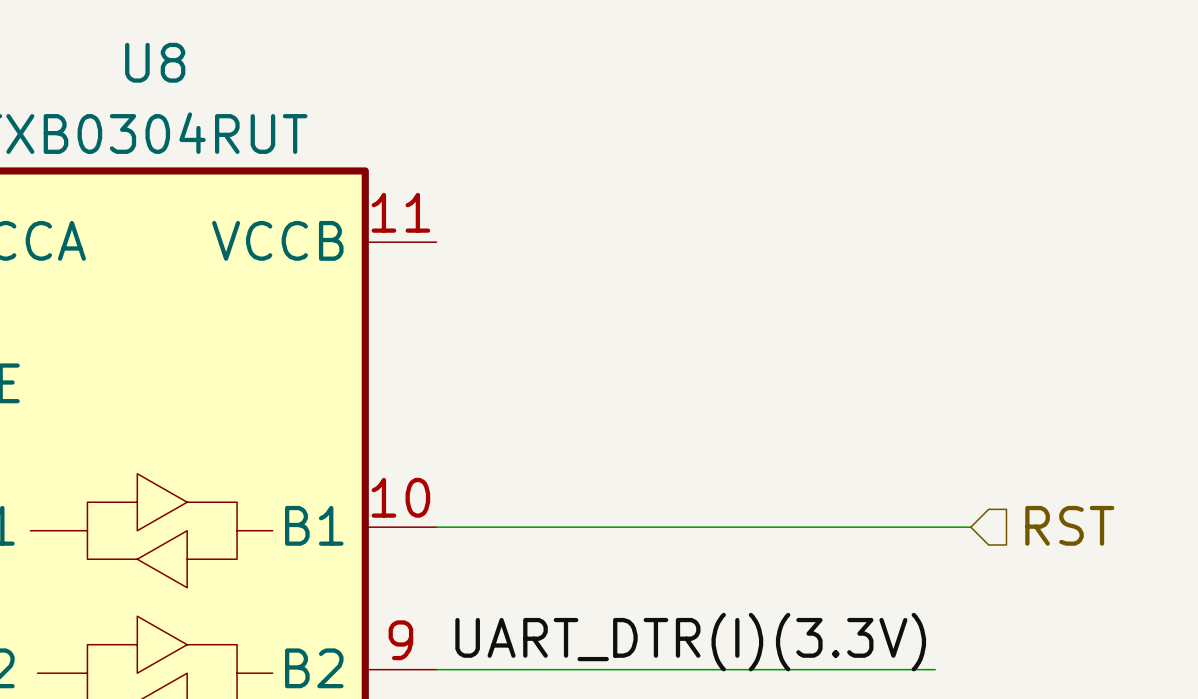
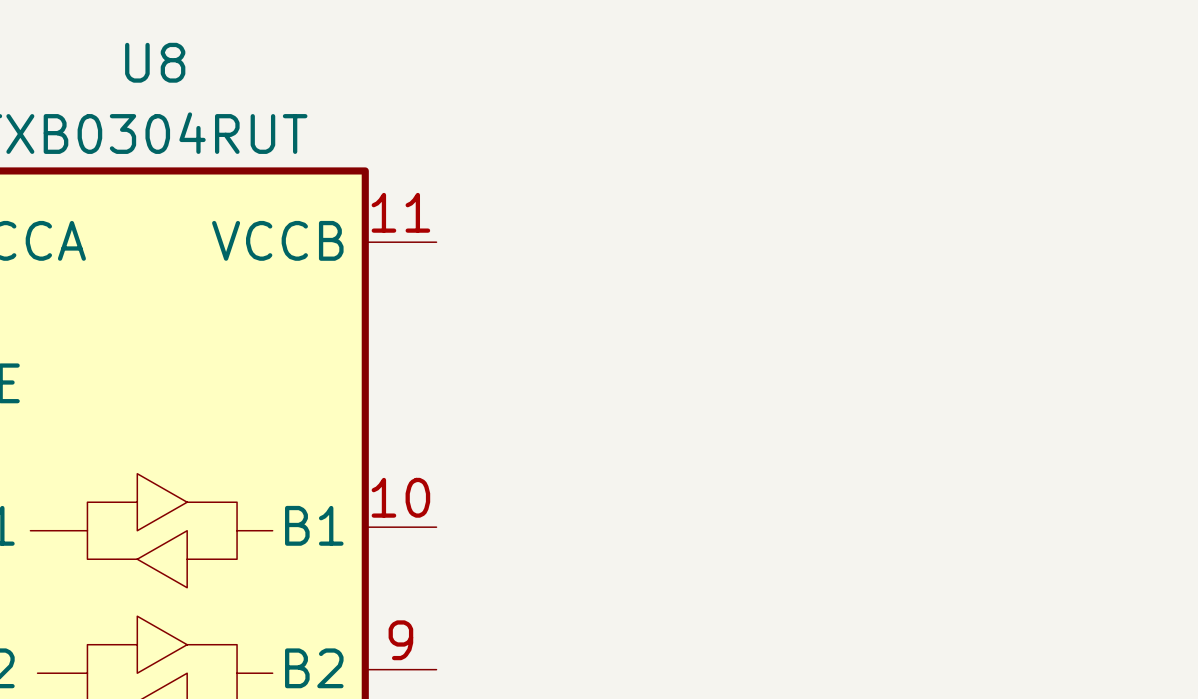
hierarchical label: RST (1069, 525) -> none
wire: (436, 527) (970, 527) -> none
label: UART_DTR(I)(3.3V) (690, 642) -> none
wire: (436, 669) (935, 669) -> none

